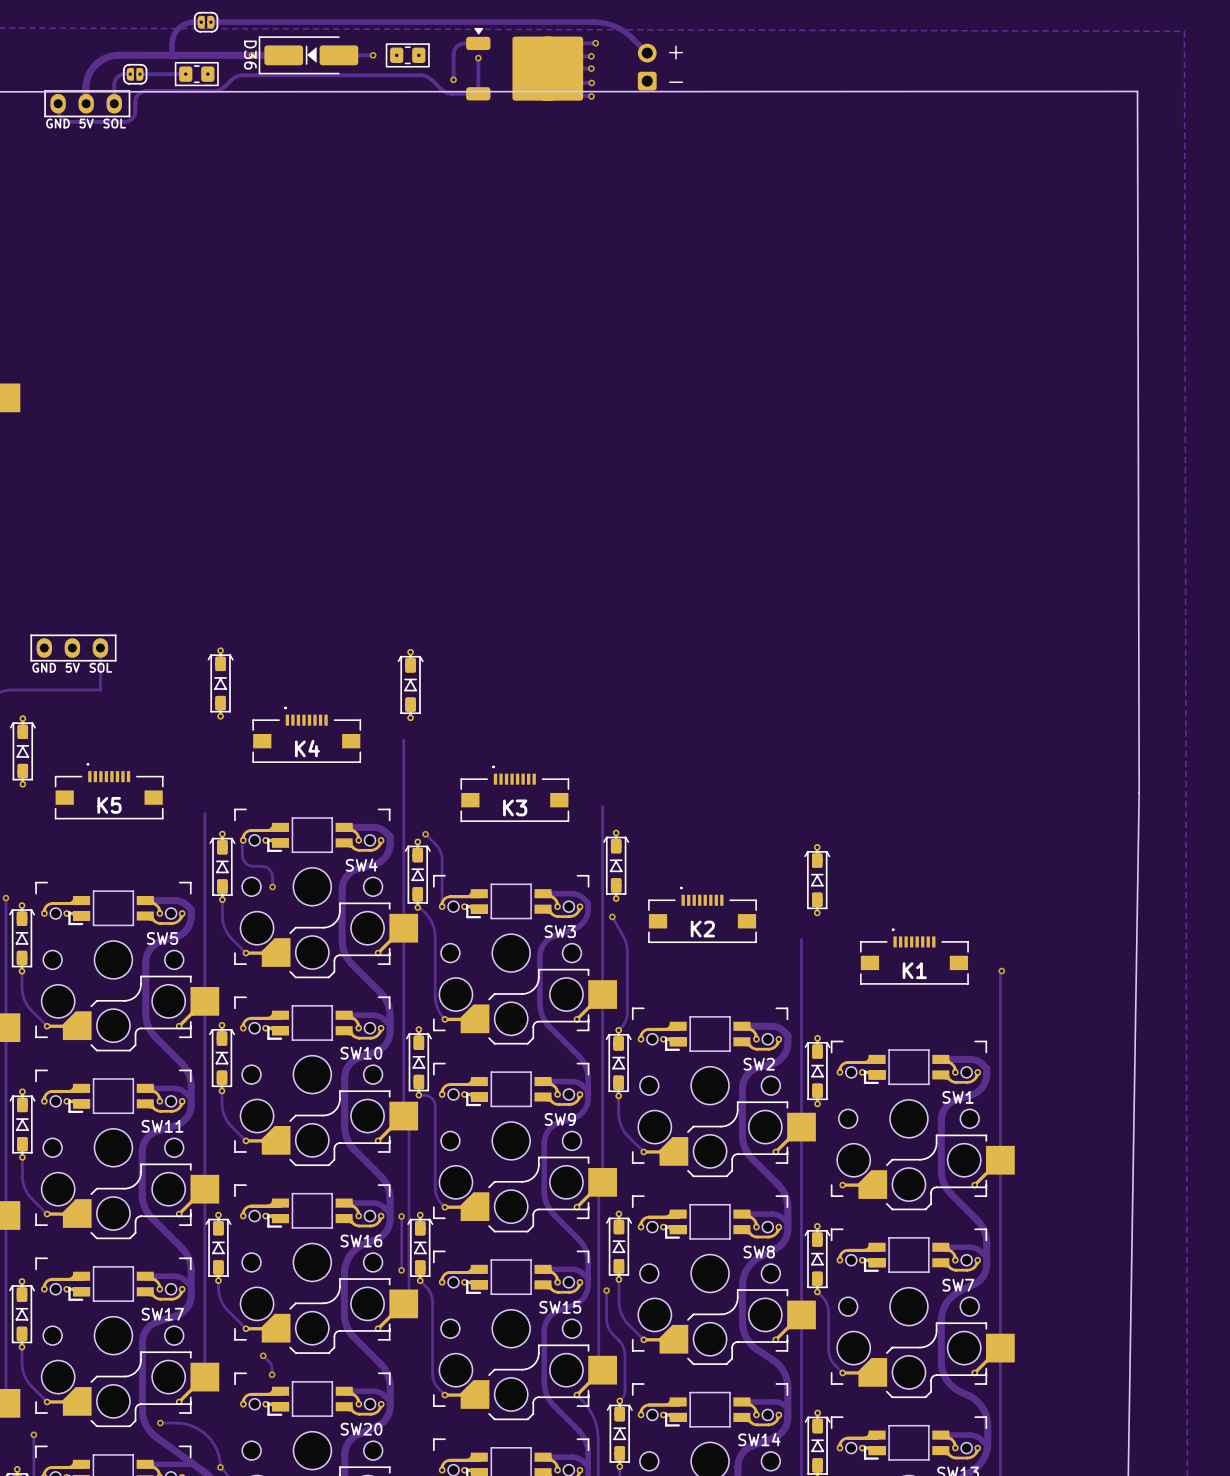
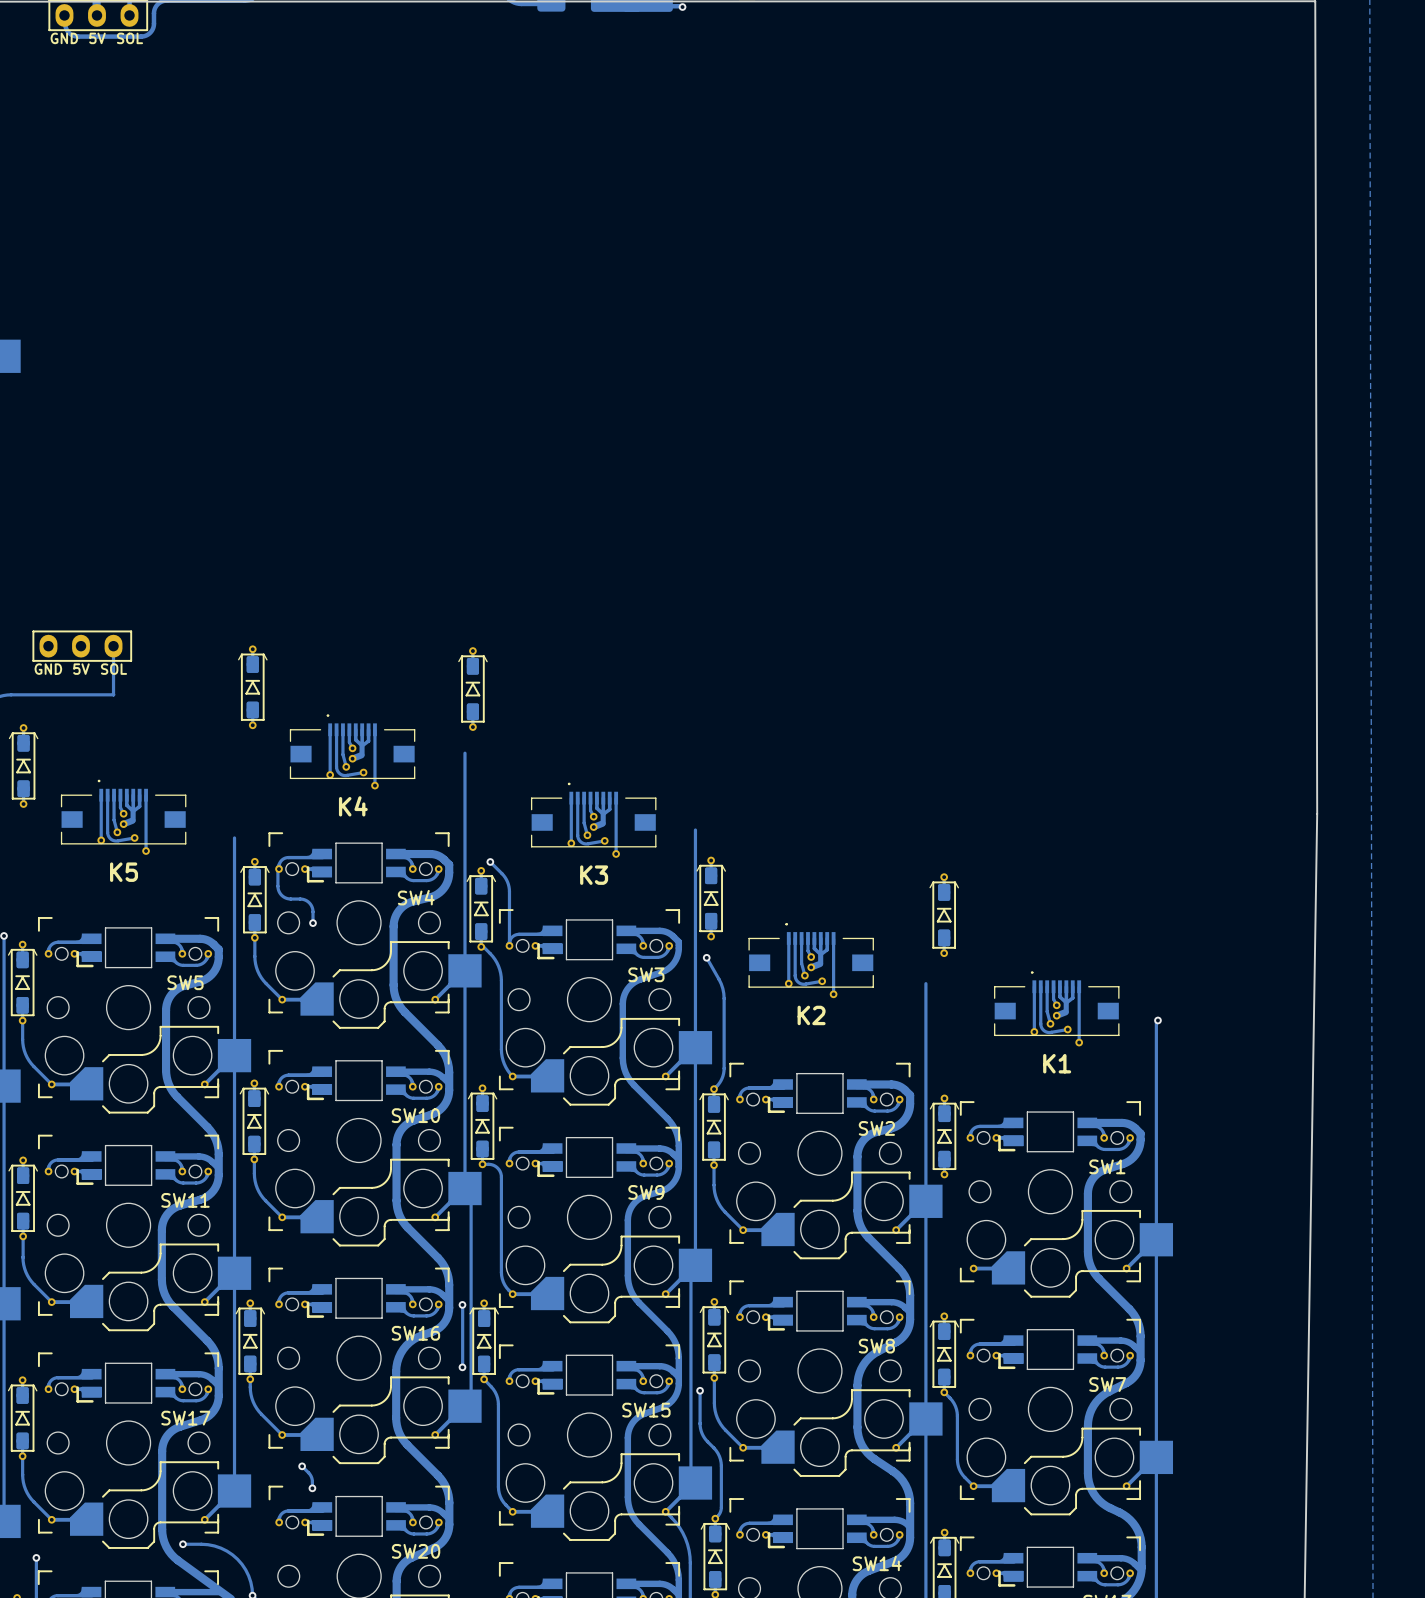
K4 footprint: [252, 706, 361, 763] -> [289, 714, 416, 790]
K4 name position: K4 (307, 748) -> K4 (353, 806)
K5 footprint: [55, 763, 164, 820] -> [60, 779, 187, 855]
K3 footprint: [460, 765, 569, 822] -> [530, 782, 657, 858]
K5 name position: K5 (109, 805) -> K5 (124, 872)
K3 name position: K3 (515, 807) -> K3 (594, 875)
K2 footprint: [648, 886, 757, 943] -> [748, 922, 874, 999]
K1 footprint: [860, 928, 969, 985] -> [994, 971, 1120, 1047]
K2 name position: K2 (702, 929) -> K2 (811, 1015)
K1 name position: K1 (914, 970) -> K1 (1057, 1063)

